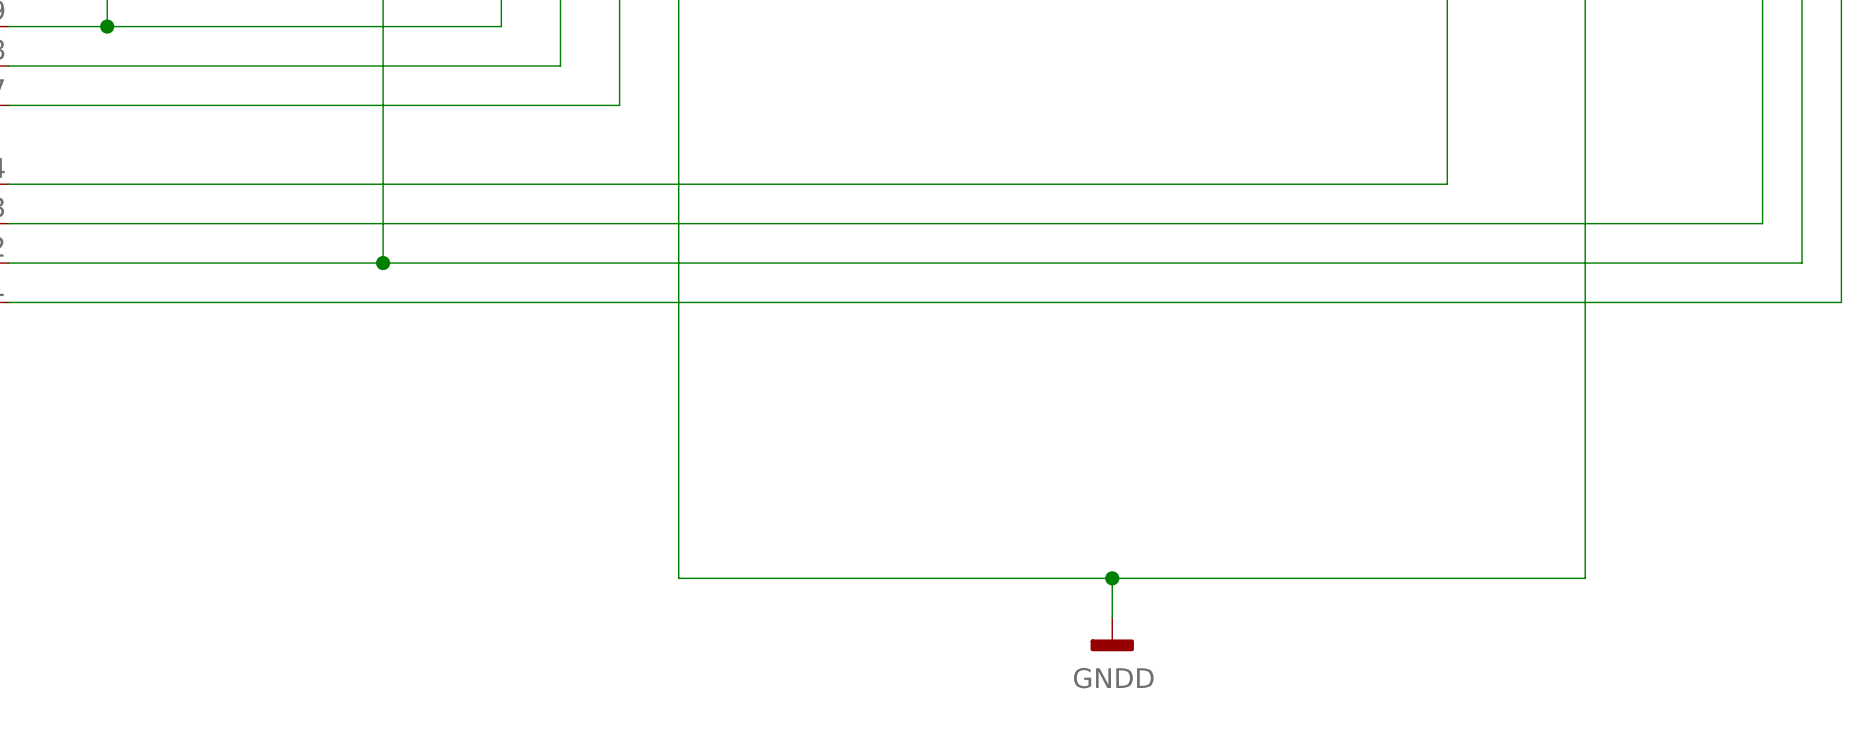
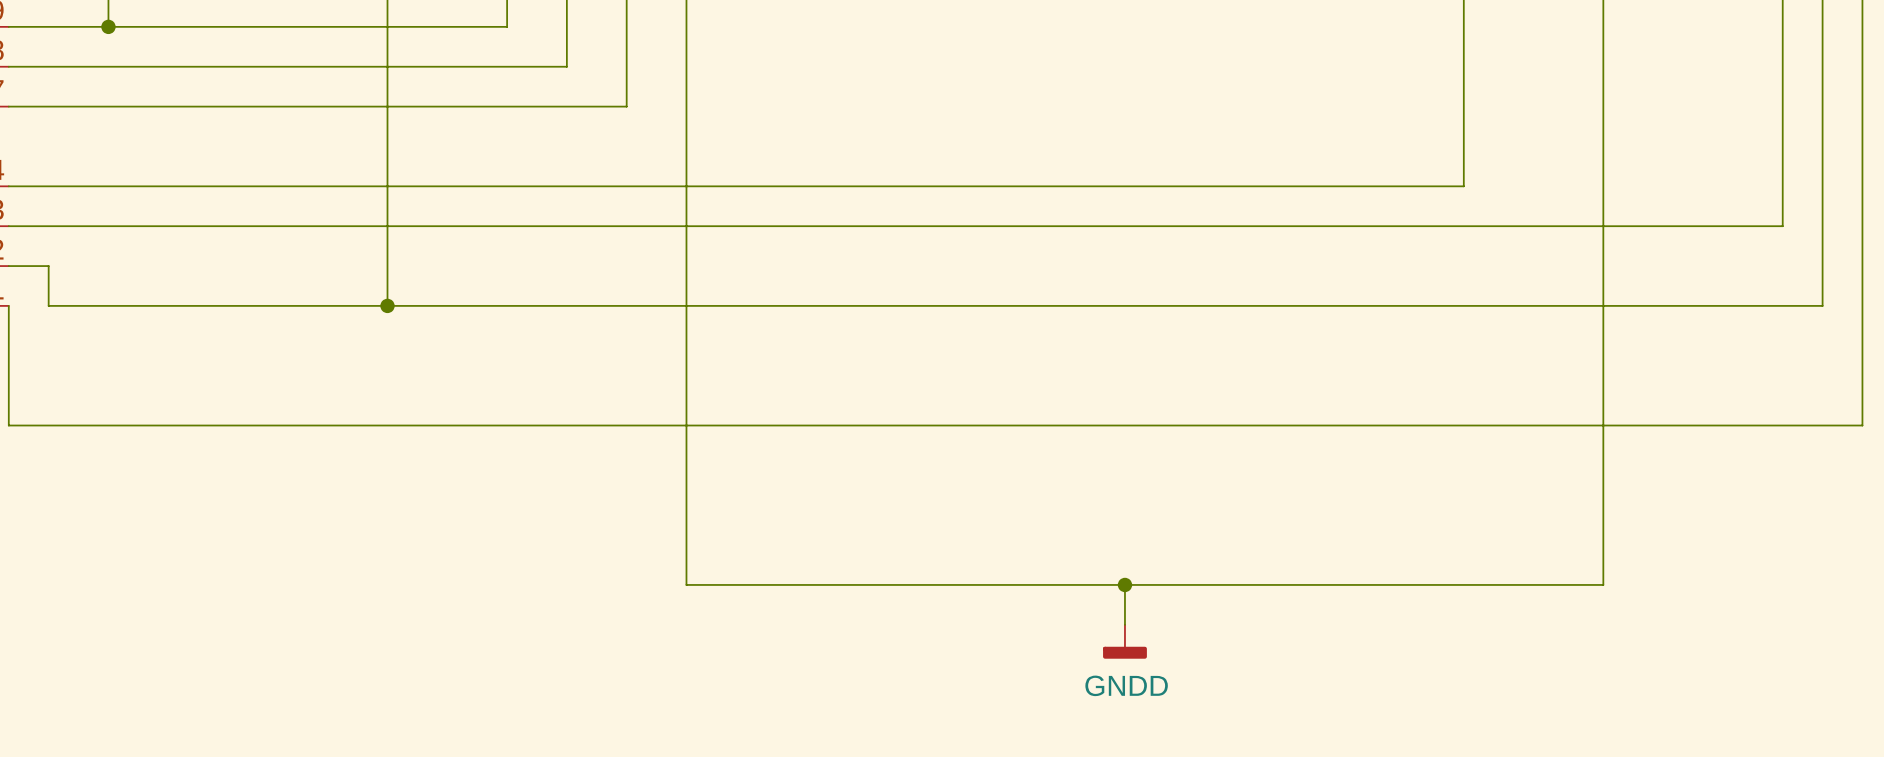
wire: (48, 263) (1801, 263) -> none
wire: none -> (387, 266) (387, 305)
junction position: (383, 263) -> (387, 305)
wire: (8, 302) (48, 302) -> (48, 266) (48, 305)
wire: none -> (8, 305) (8, 425) (1862, 425) (1862, 305)
wire: (1801, 302) (1841, 302) -> (1822, 305) (1822, 266)

